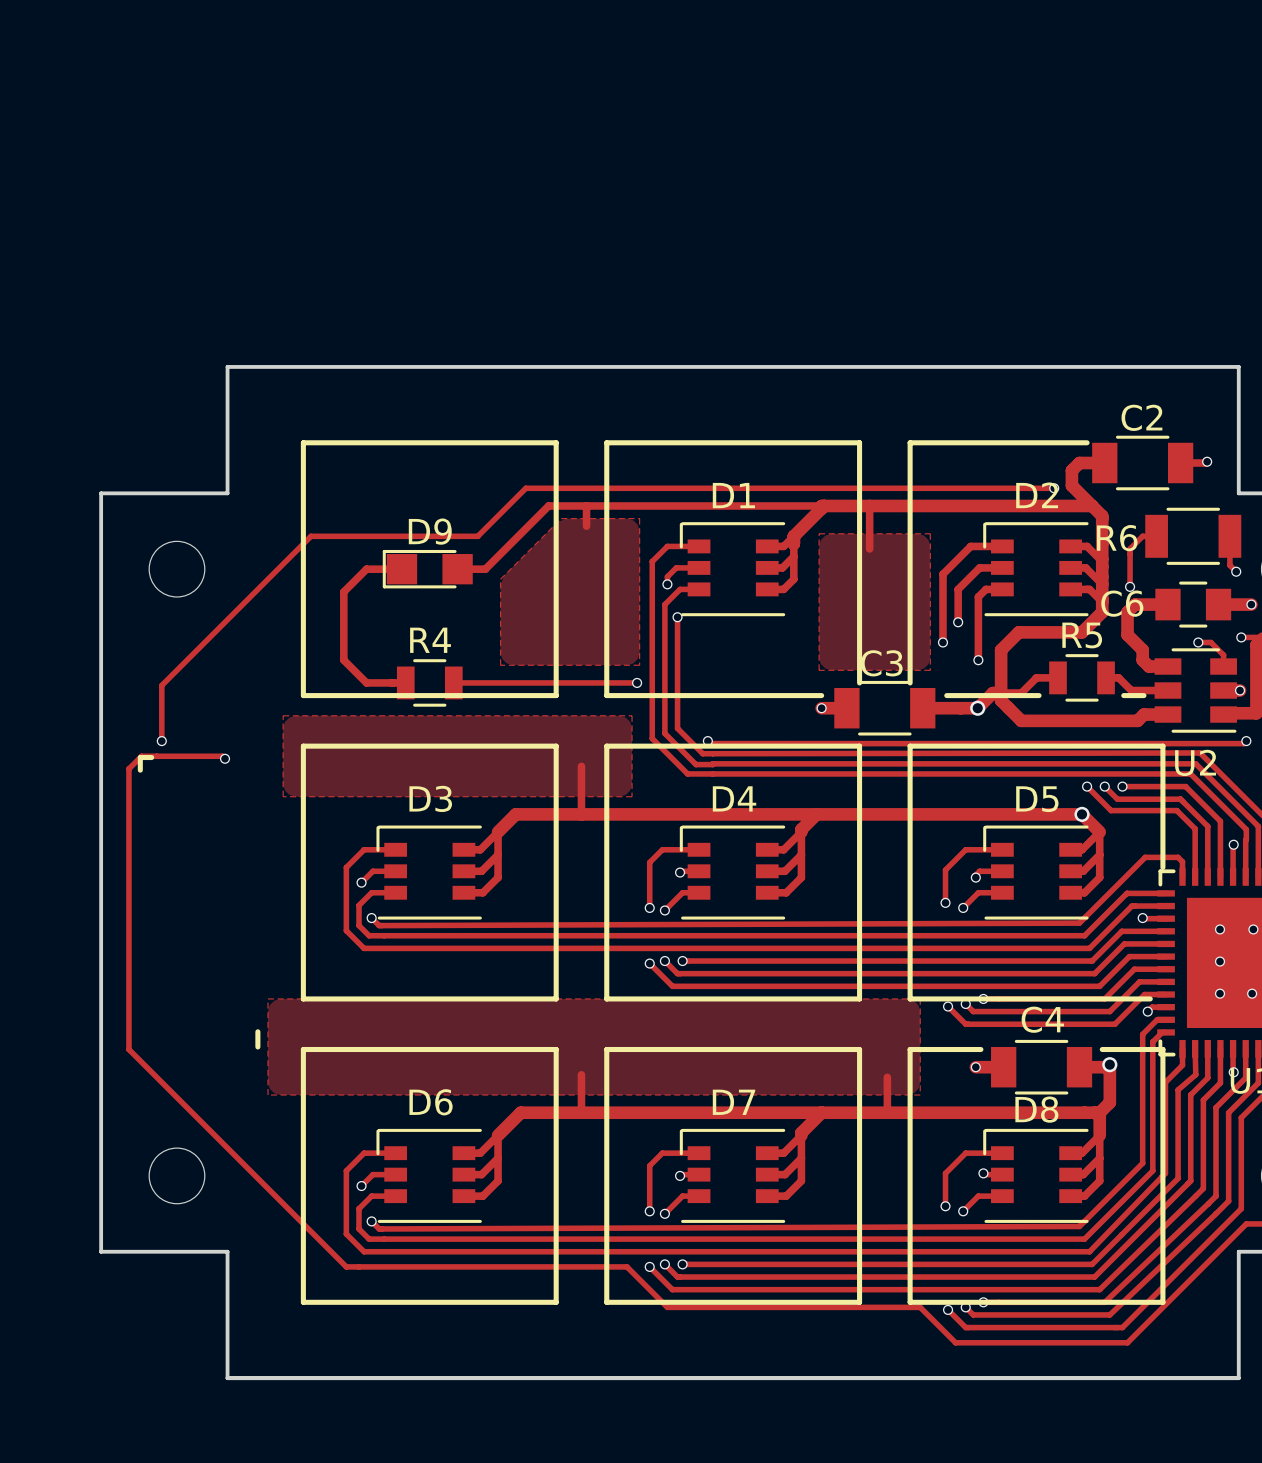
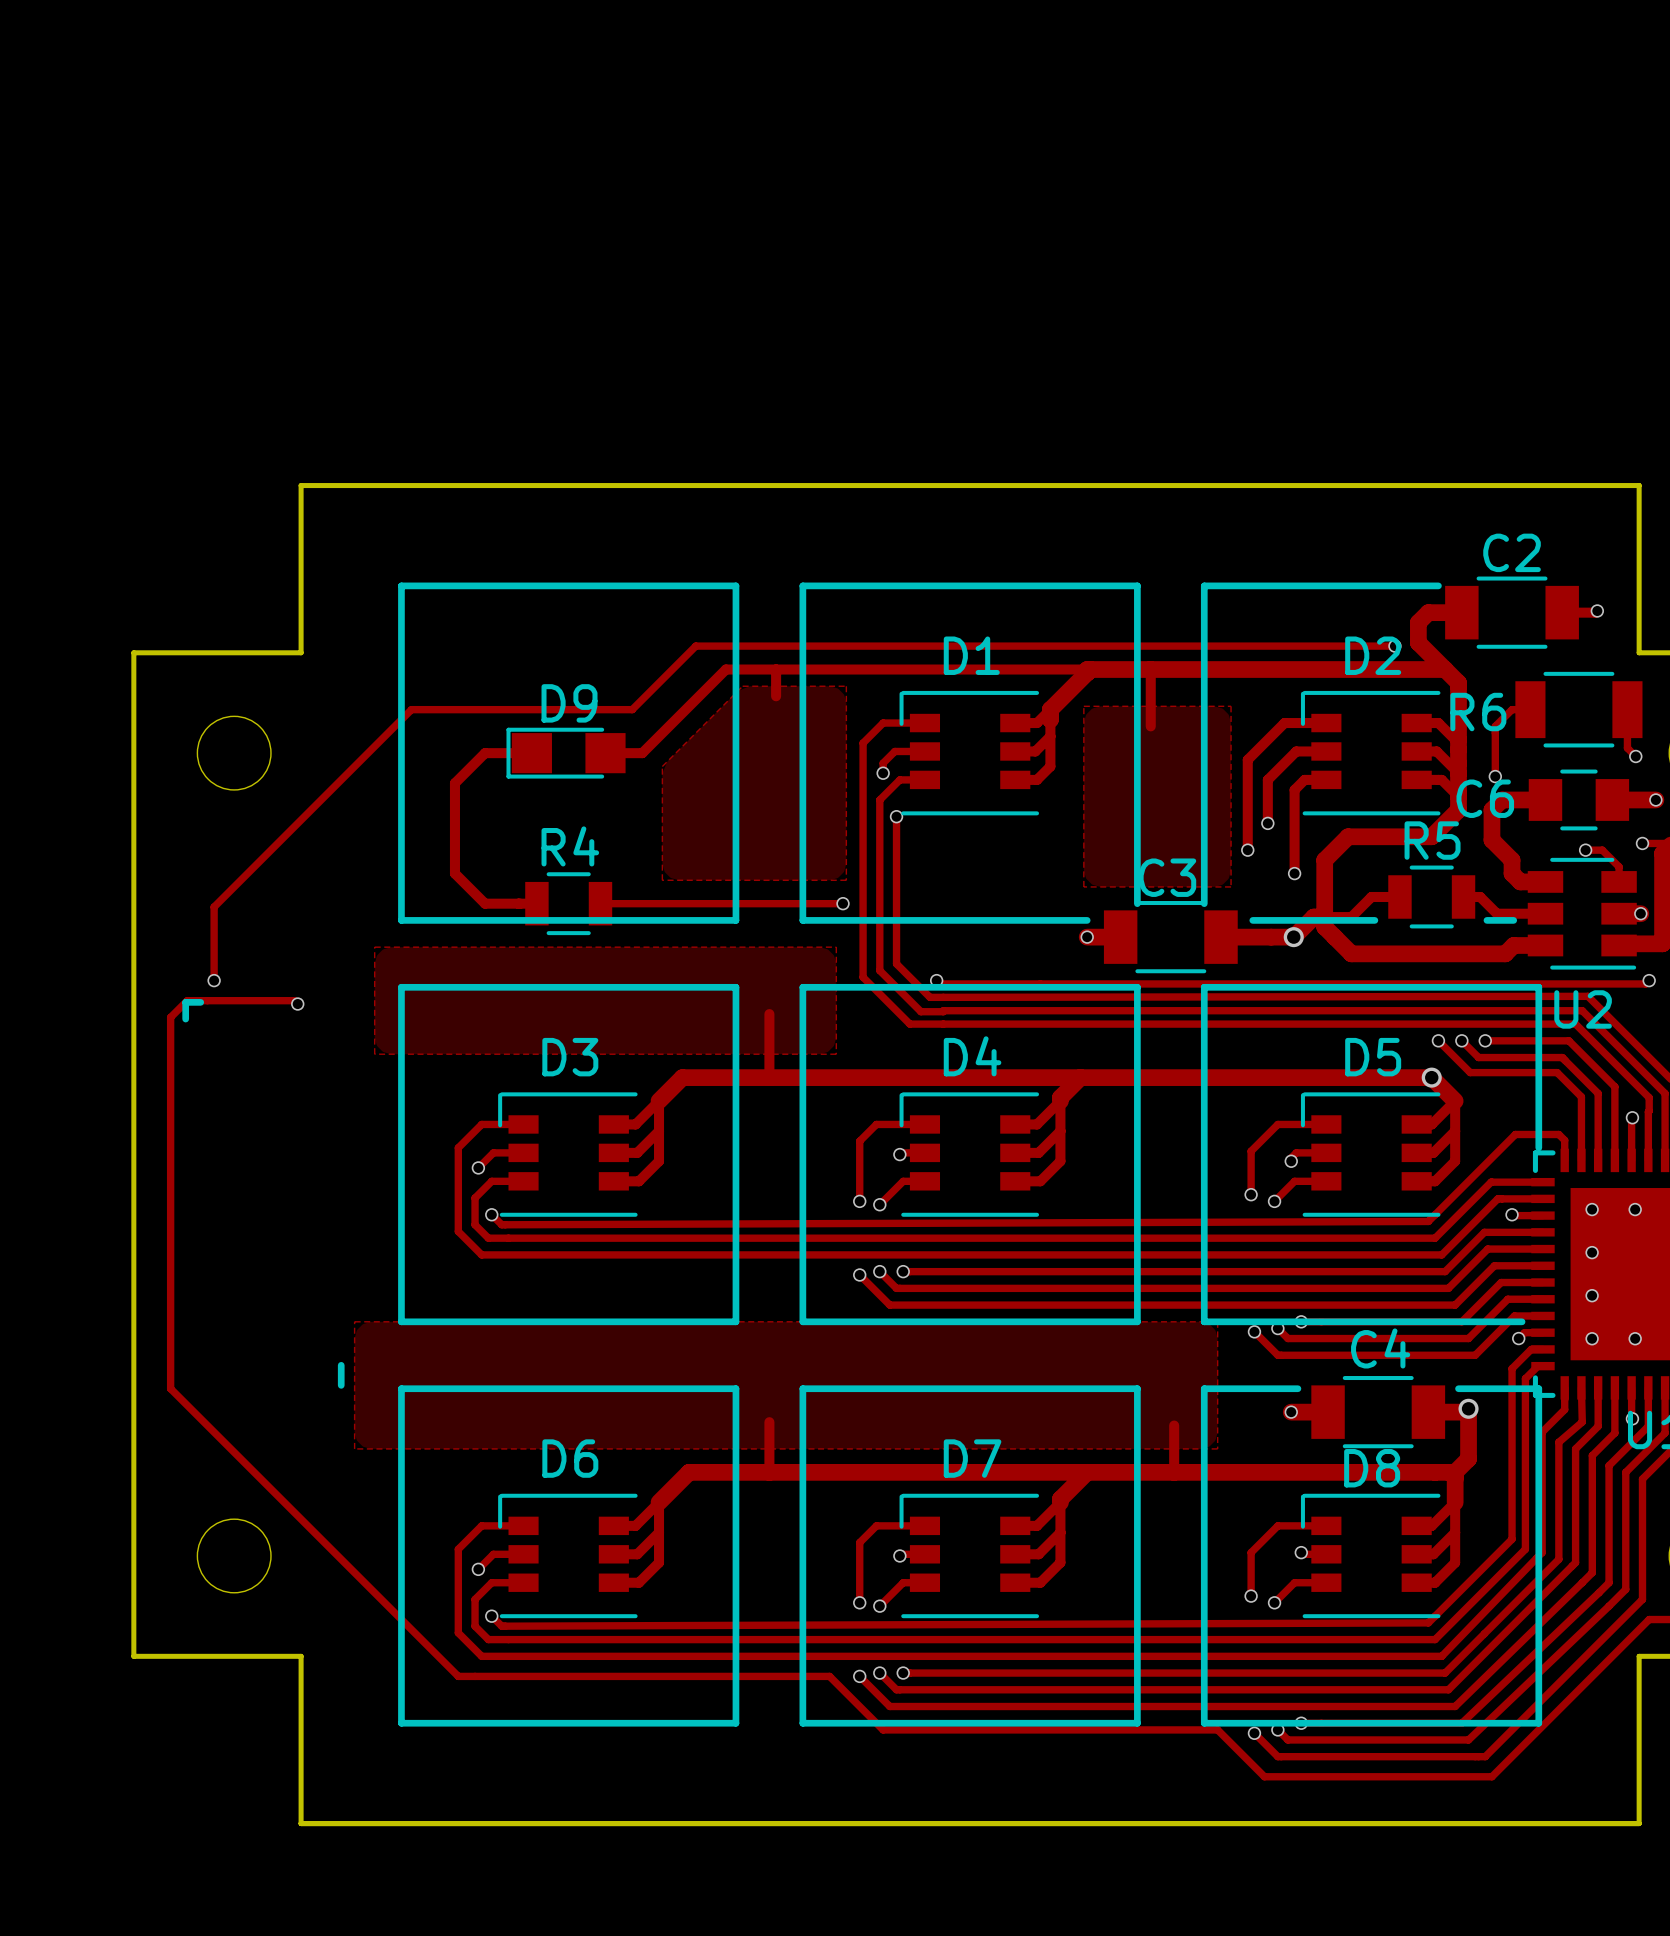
via: none -> (1592, 1209)
via: none -> (1635, 1209)
via: (1220, 929) -> none
via: (1253, 929) -> none
via: none -> (1592, 1252)
via: (1220, 961) -> none
via: none -> (1592, 1295)
via: (1220, 993) -> none
via: (1252, 993) -> none
via: none -> (1592, 1338)
via: none -> (1635, 1338)

